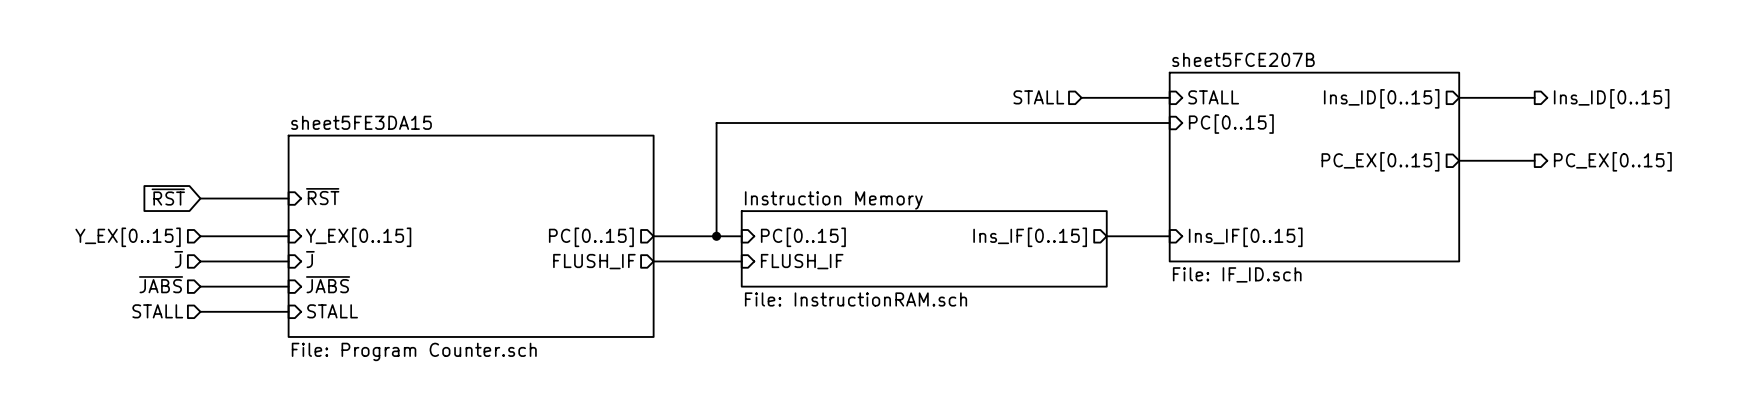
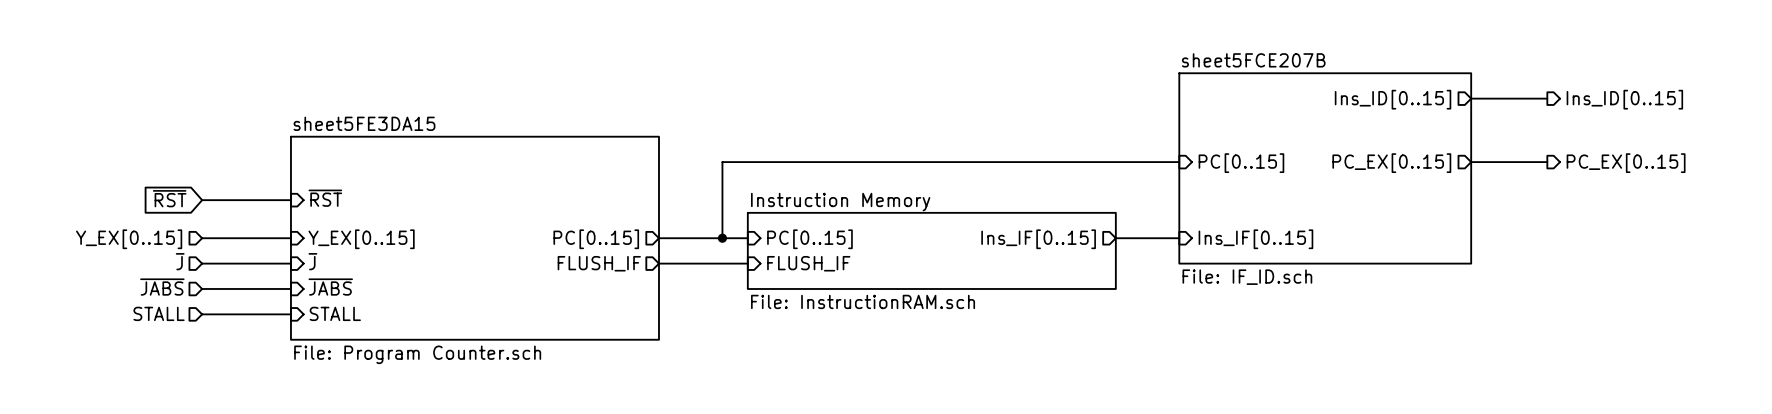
hierarchical label: STALL (1038, 97) -> none
wire: (1081, 97) (1169, 97) -> none
sheet pin: STALL (1213, 97) -> none
bus: (1169, 123) (716, 123) (716, 160) -> (1179, 162) (722, 162)
sheet pin position: PC[0..15] (1231, 124) -> PC[0..15] (1241, 163)

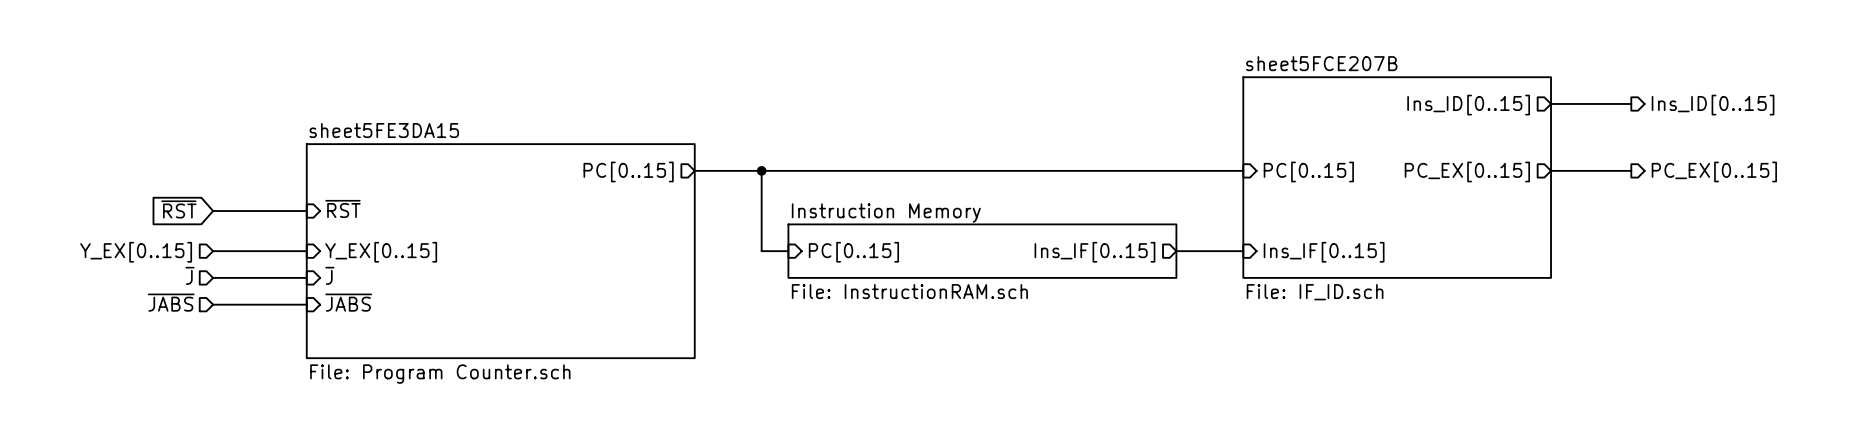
junction: none -> (761, 170)
bus: (658, 238) (722, 238) -> (694, 170) (761, 170)
junction: (722, 238) -> none
sheet Instruction Memory: none -> File: InstructionRAM.sch (982, 251)
sheet pin position: PC[0..15] (596, 239) -> PC[0..15] (628, 171)
sheet Instruction Memory: File: InstructionRAM.sch (931, 250) -> none
sheet pin: FLUSH_IF (599, 263) -> none
wire: (658, 263) (747, 263) -> none
sheet pin: FLUSH_IF (808, 263) -> none
hierarchical label: STALL (159, 313) -> none
sheet pin: STALL (335, 313) -> none
wire: (202, 314) (290, 314) -> none

